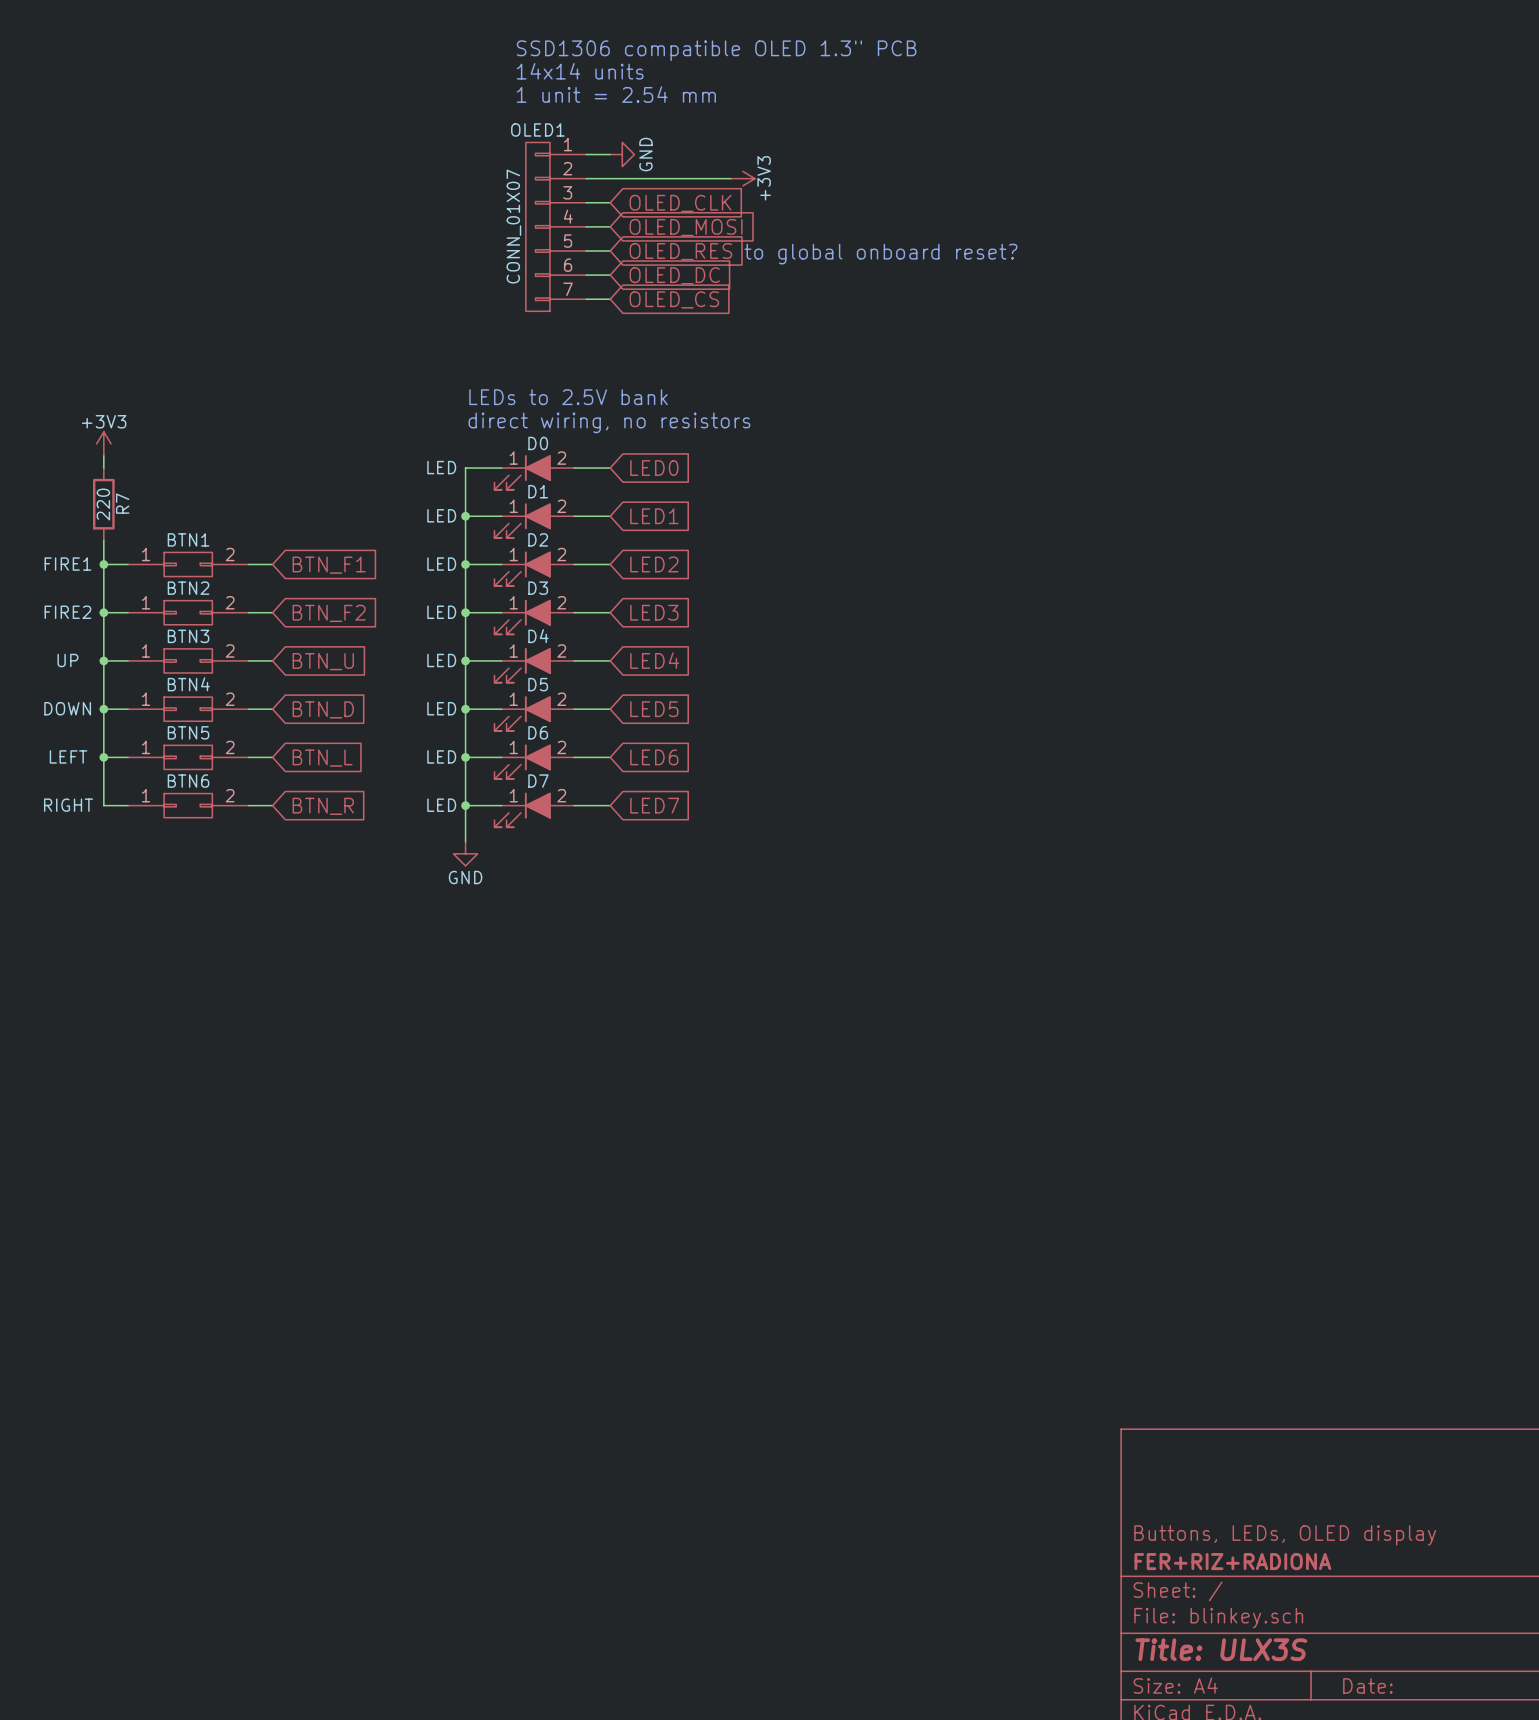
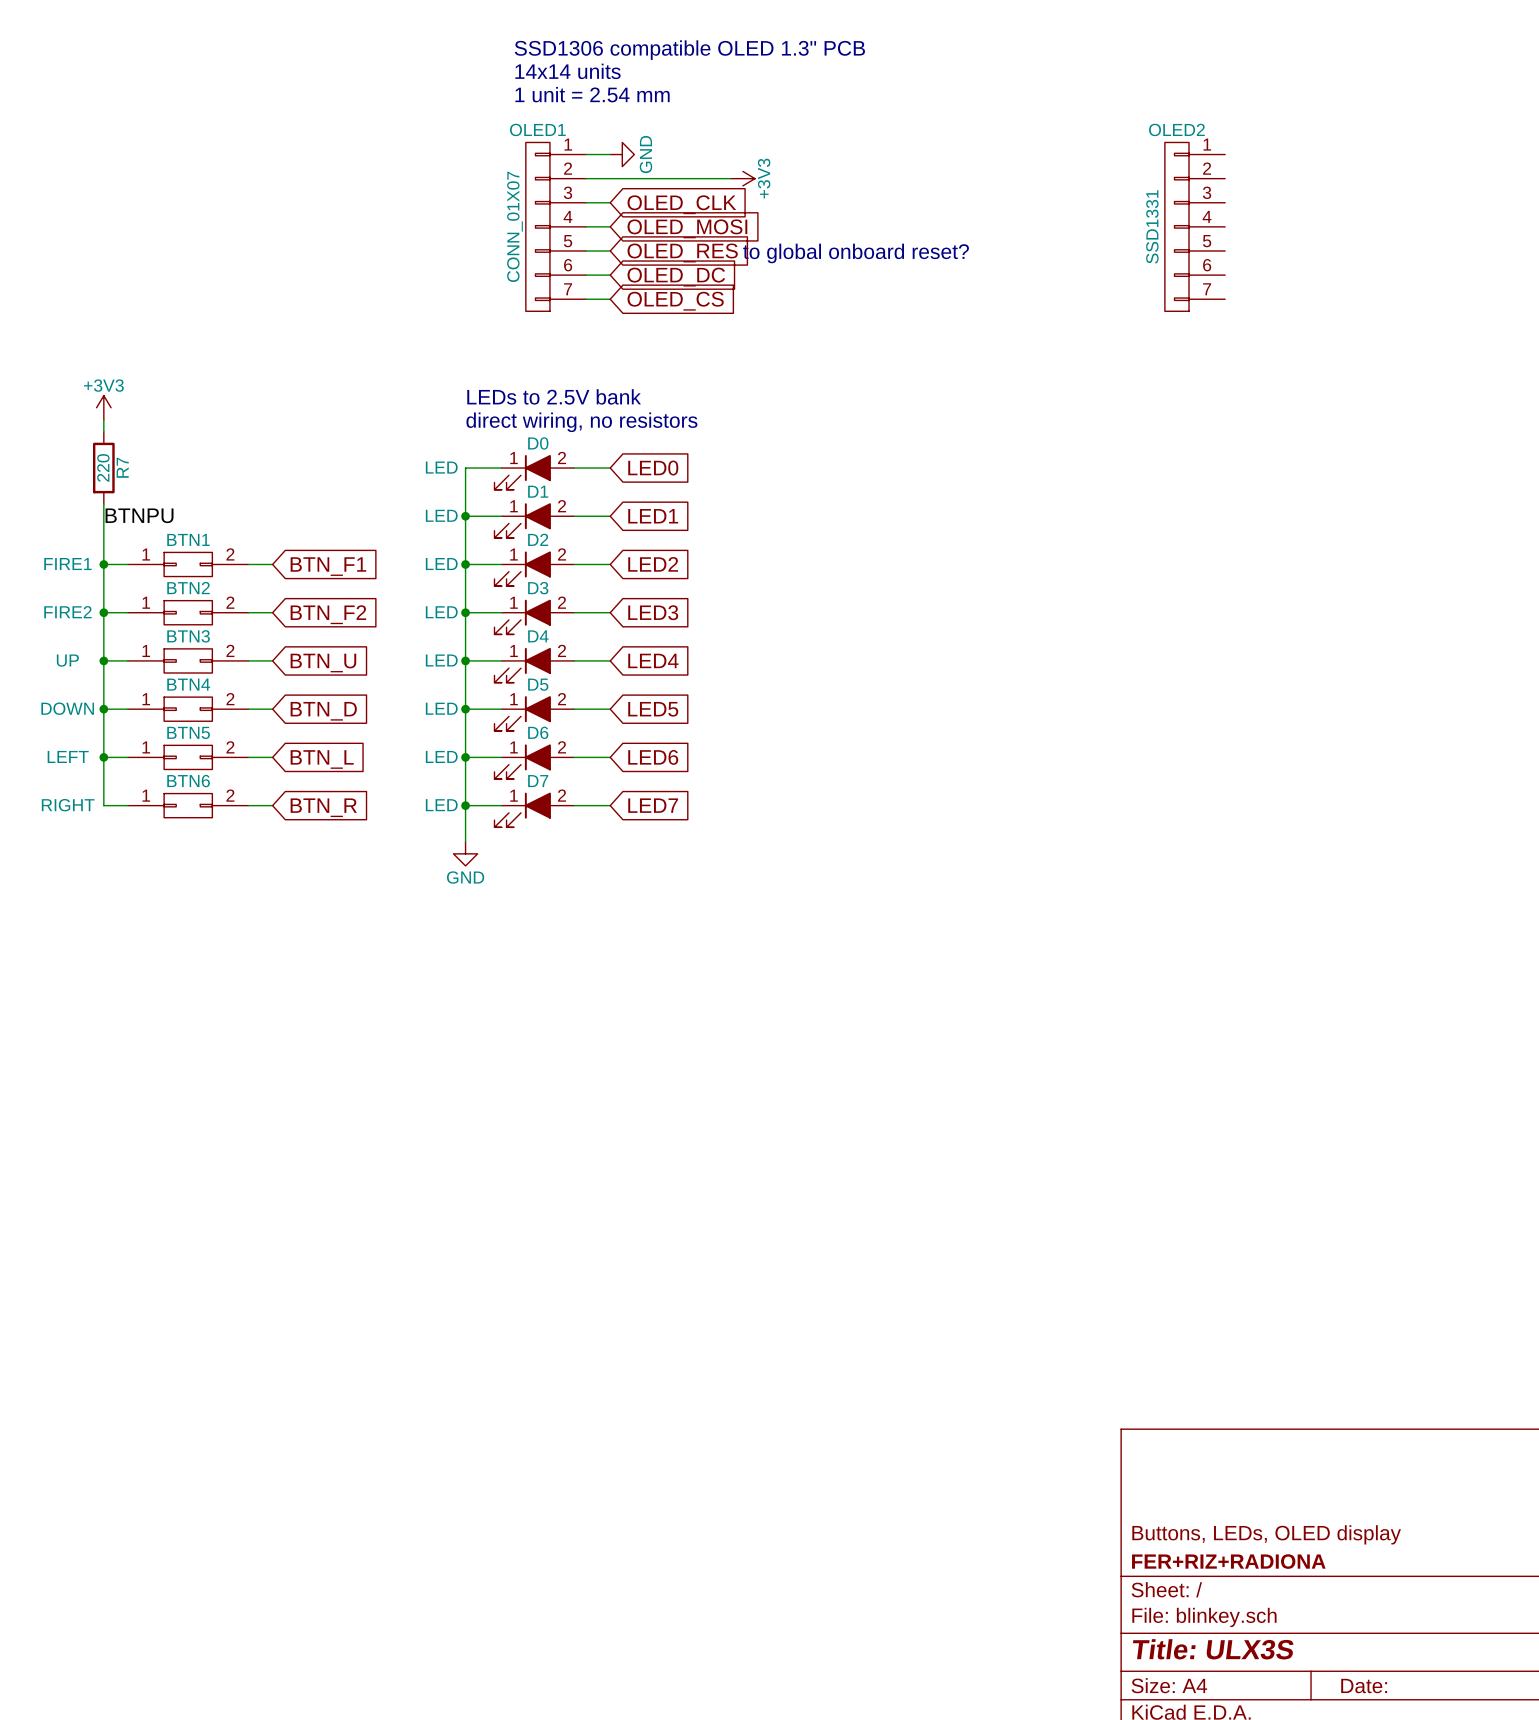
OLED2: none -> SSD1331 (1195, 226)
power symbol position: +3V3 (103, 443) -> +3V3 (103, 407)
wire: (103, 455) (103, 468) -> (103, 419) (103, 431)
wire: none -> (103, 504) (103, 540)
R7 position: (103, 504) -> (103, 468)
label: none -> BTNPU (139, 515)

